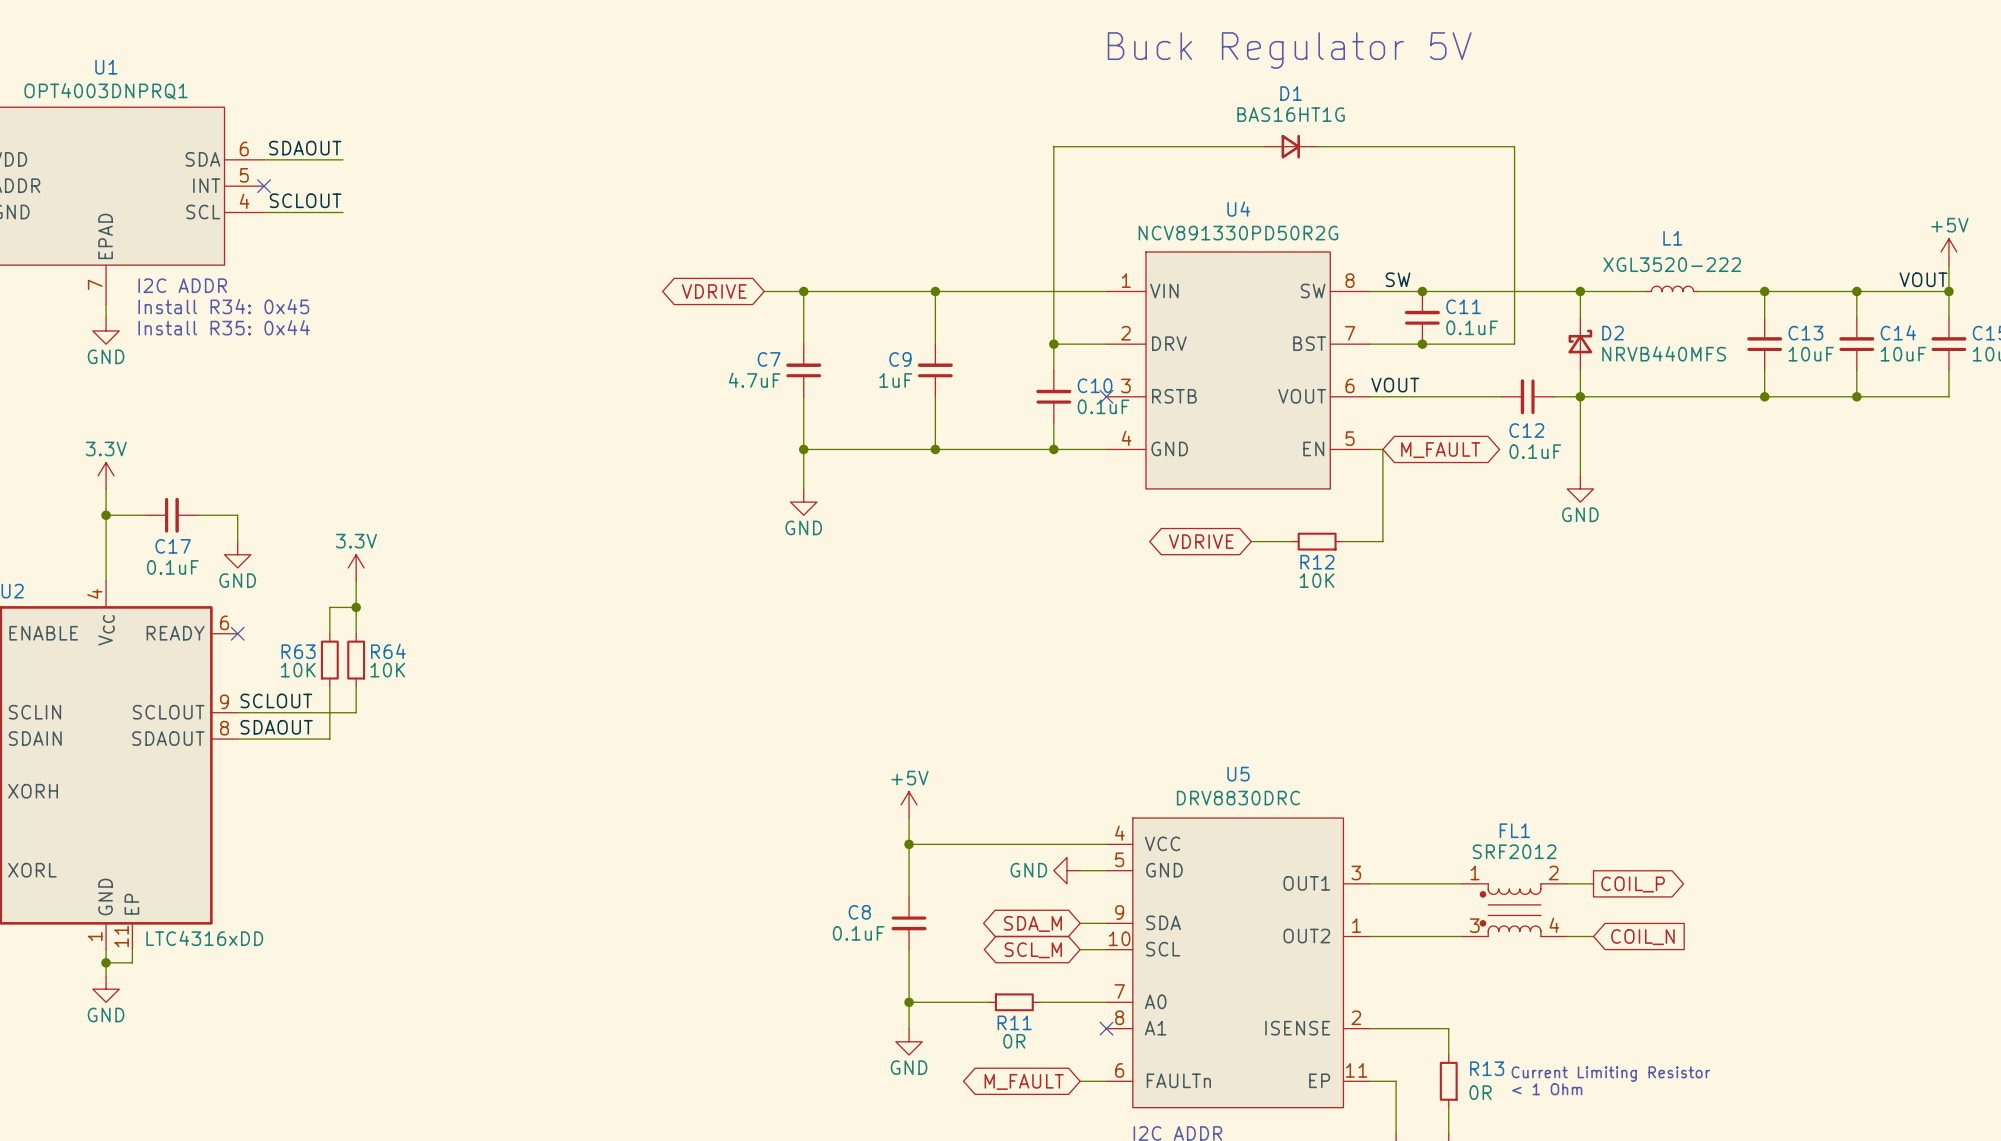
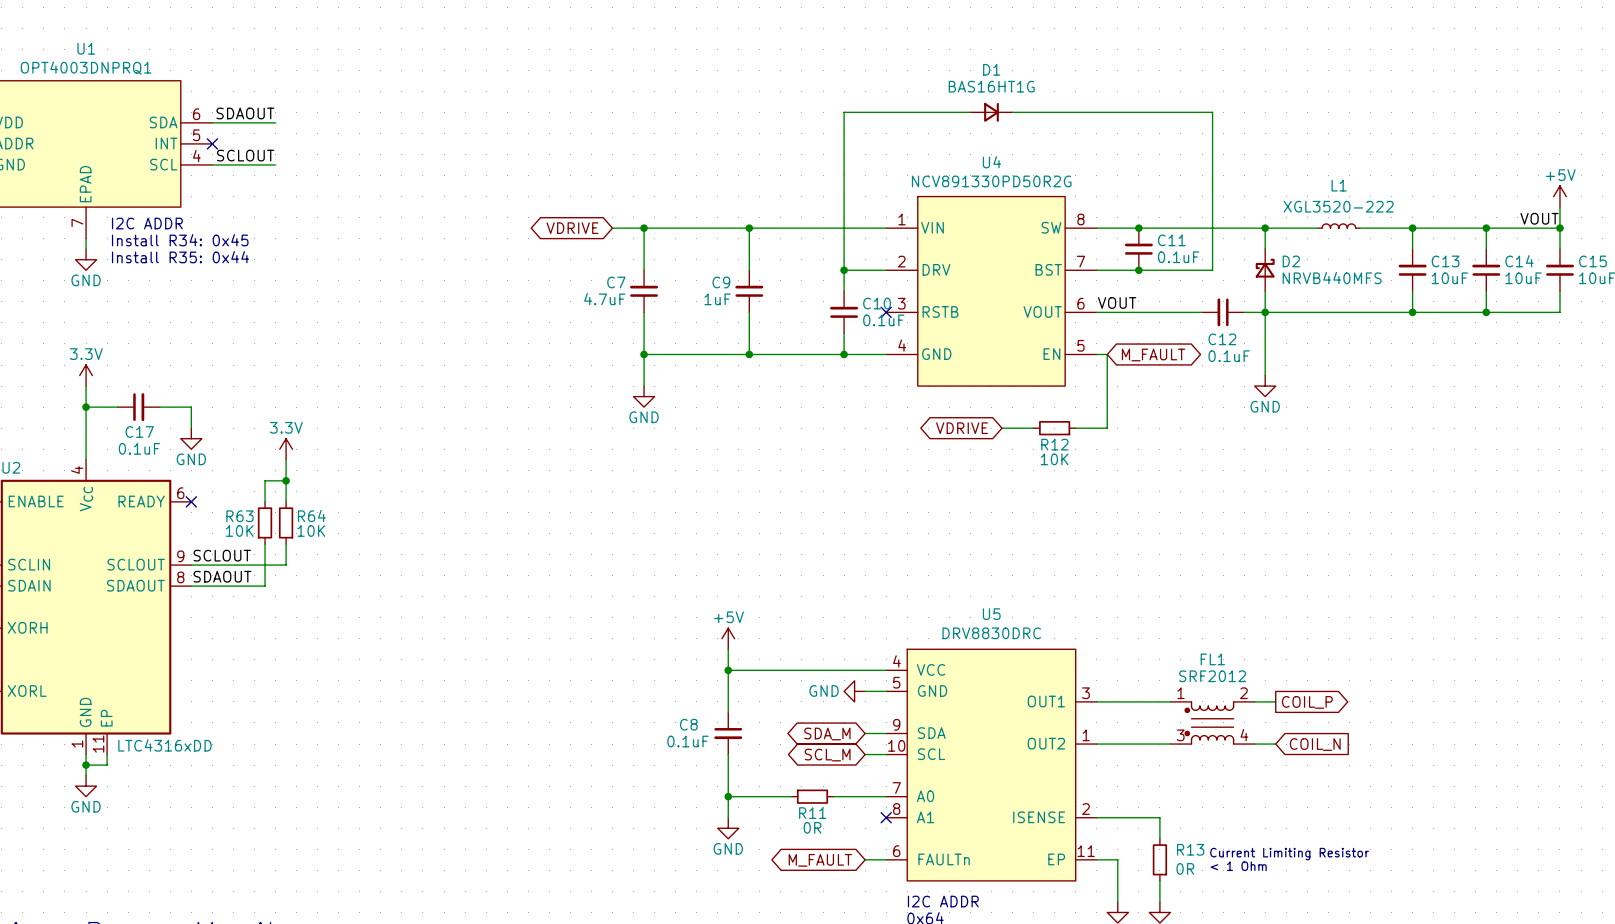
text: Buck Regulator 5V (1289, 50) -> none
D1 position: (1290, 146) -> (991, 112)
label: SW (1398, 279) -> none

